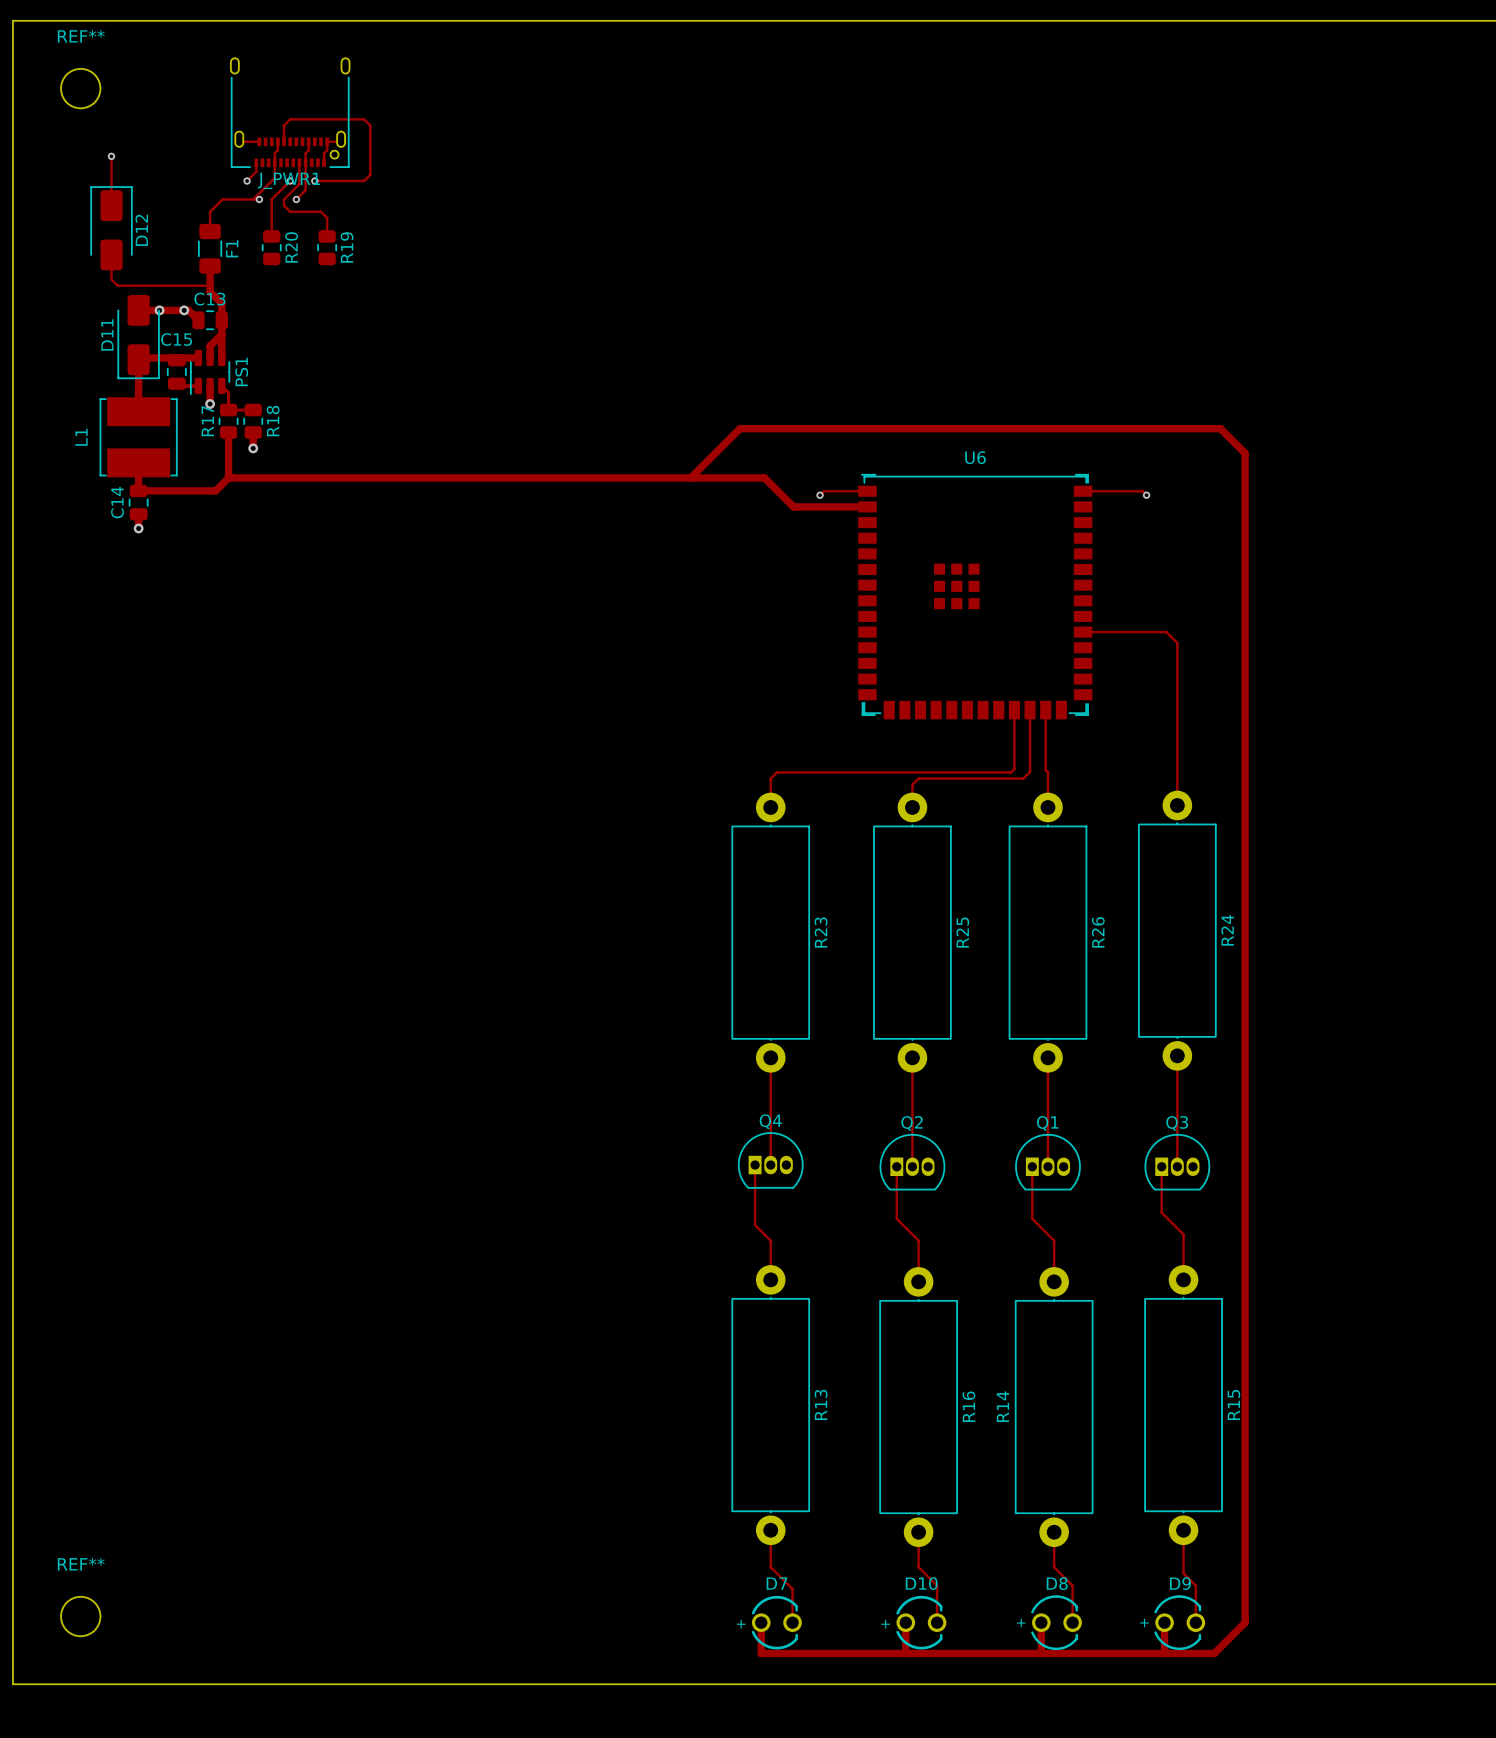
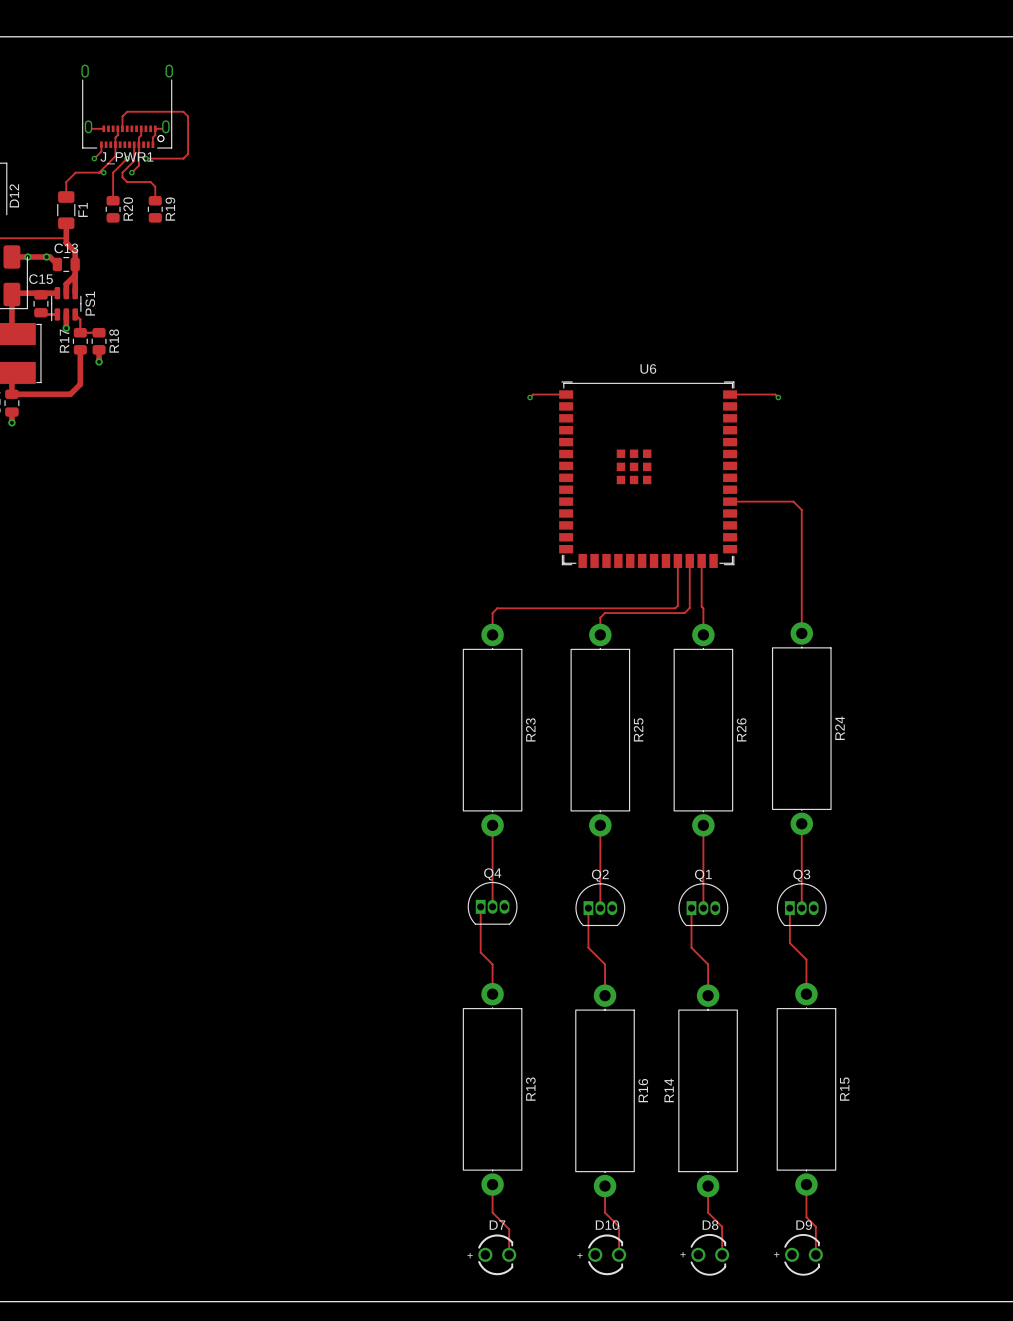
track: (228, 477) (764, 477) (793, 506) (867, 506) -> none
track: (690, 477) (739, 428) (1220, 428) (1245, 453) (1245, 1622) (1214, 1653) (761, 1653) (761, 1622) -> none
track: (905, 1622) (905, 1653) -> none
track: (1041, 1622) (1041, 1653) -> none
track: (1164, 1622) (1164, 1653) -> none

